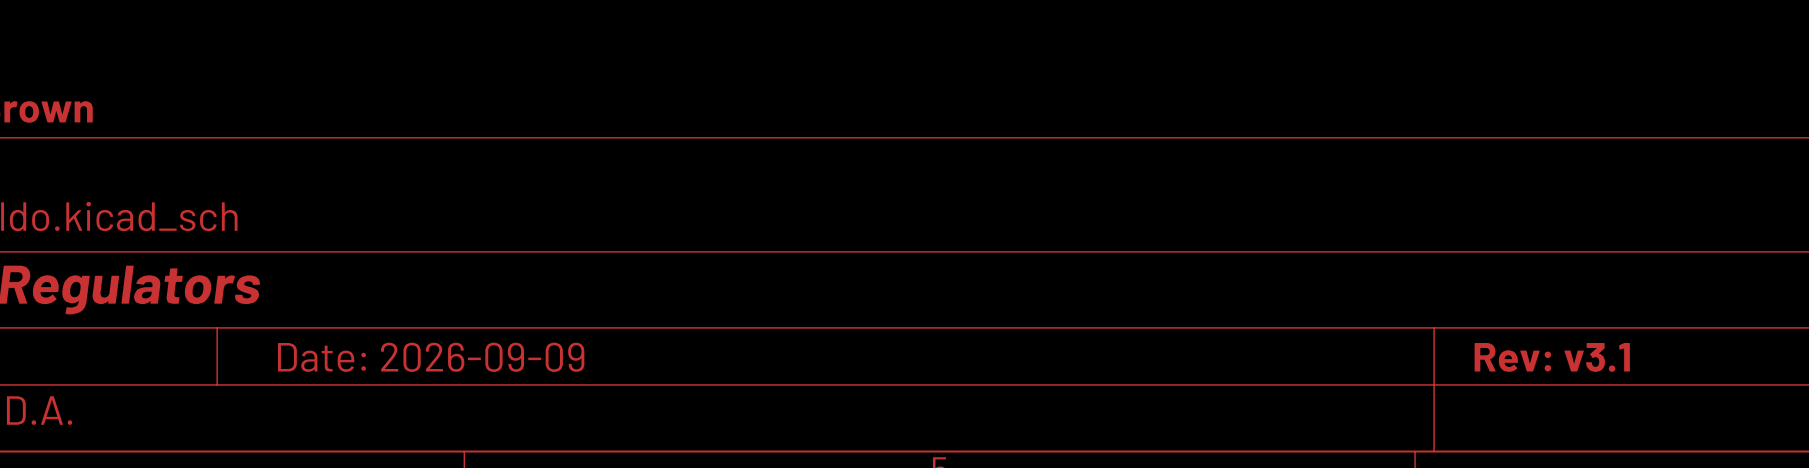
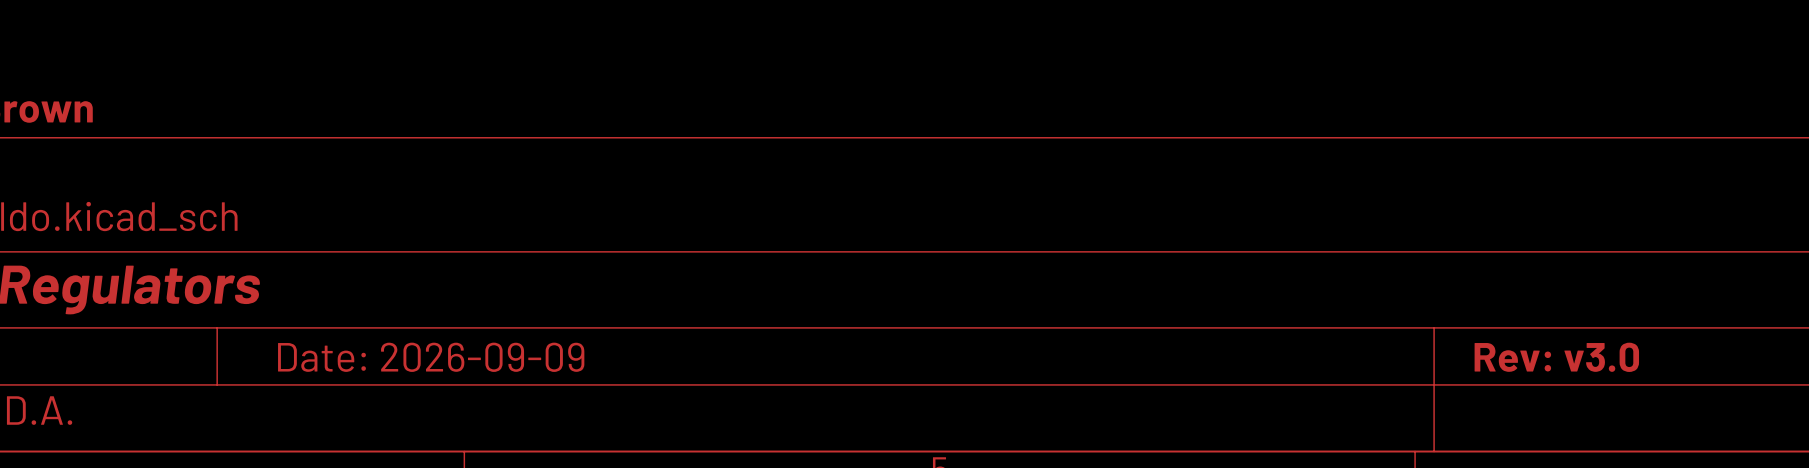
title block: Rev: v3.1 (1552, 357) -> Rev: v3.0 (1556, 357)

